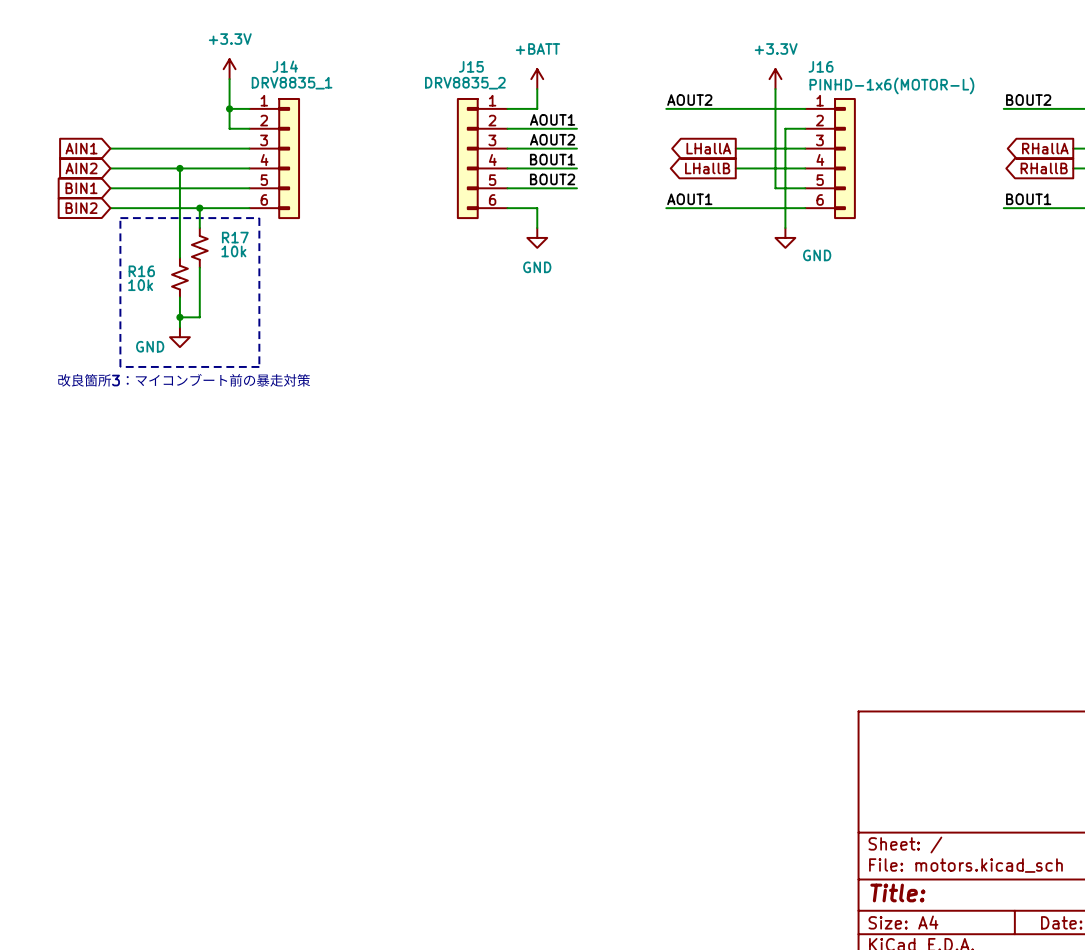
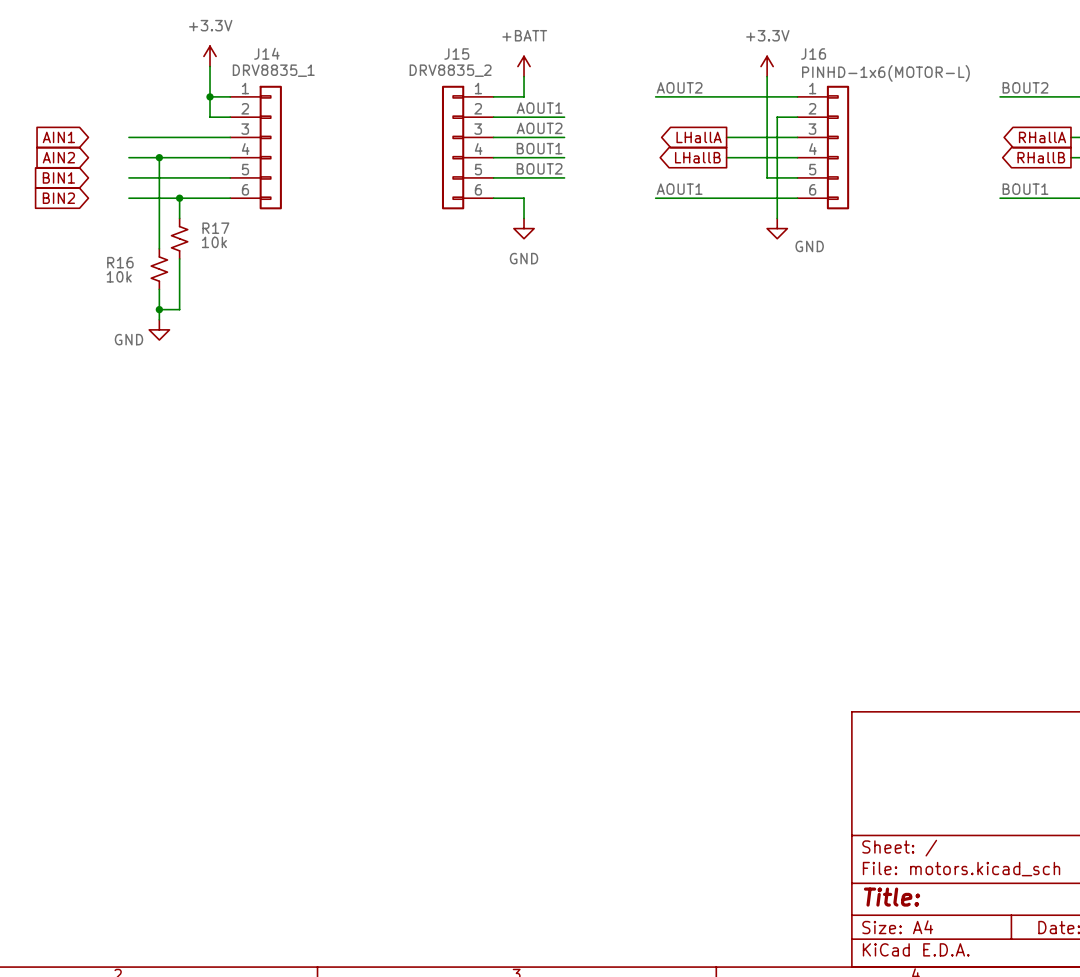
wire: (110, 148) (150, 148) -> none
wire: (110, 168) (150, 168) -> none
wire: (110, 188) (150, 188) -> none
wire: (110, 208) (150, 208) -> none
line: (120, 218) (259, 218) (259, 366) (120, 366) (120, 218) -> none
text: 改良箇所3：マイコンブート前の暴走対策 (184, 380) -> none

